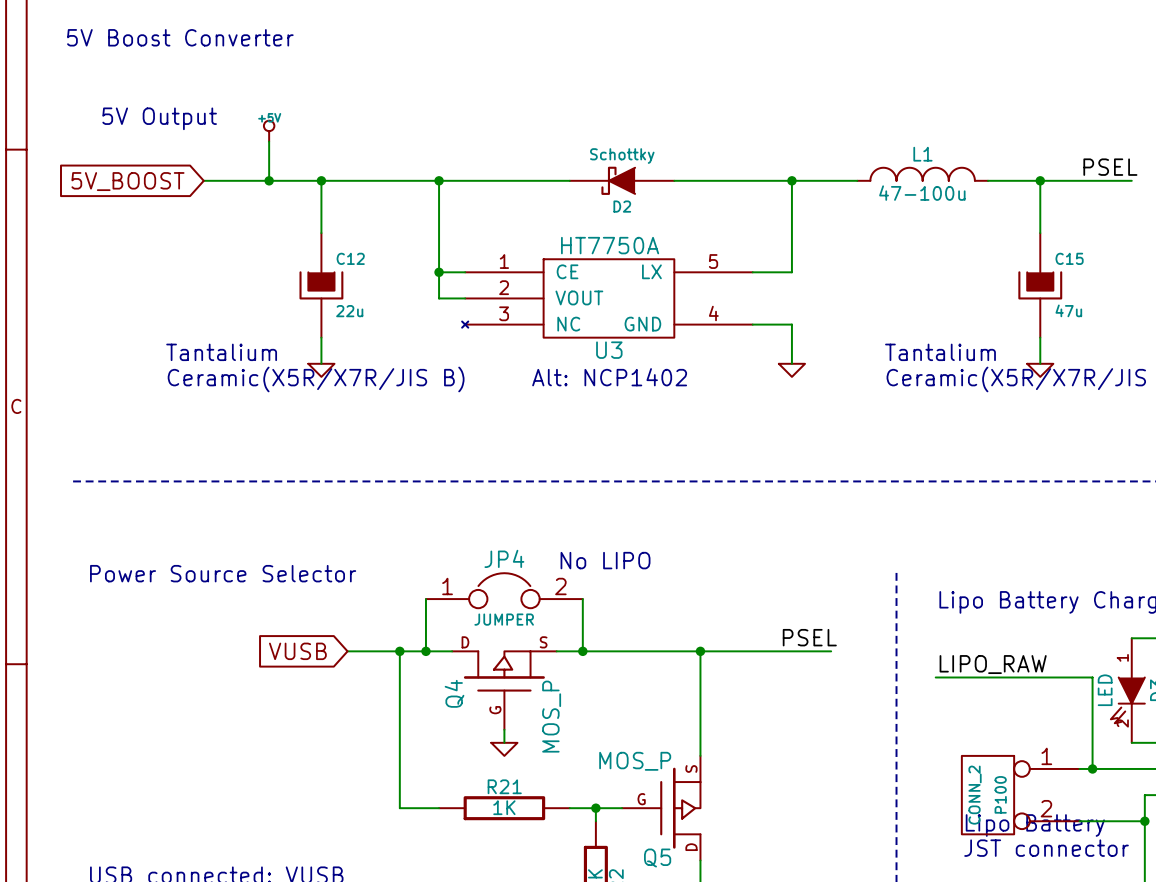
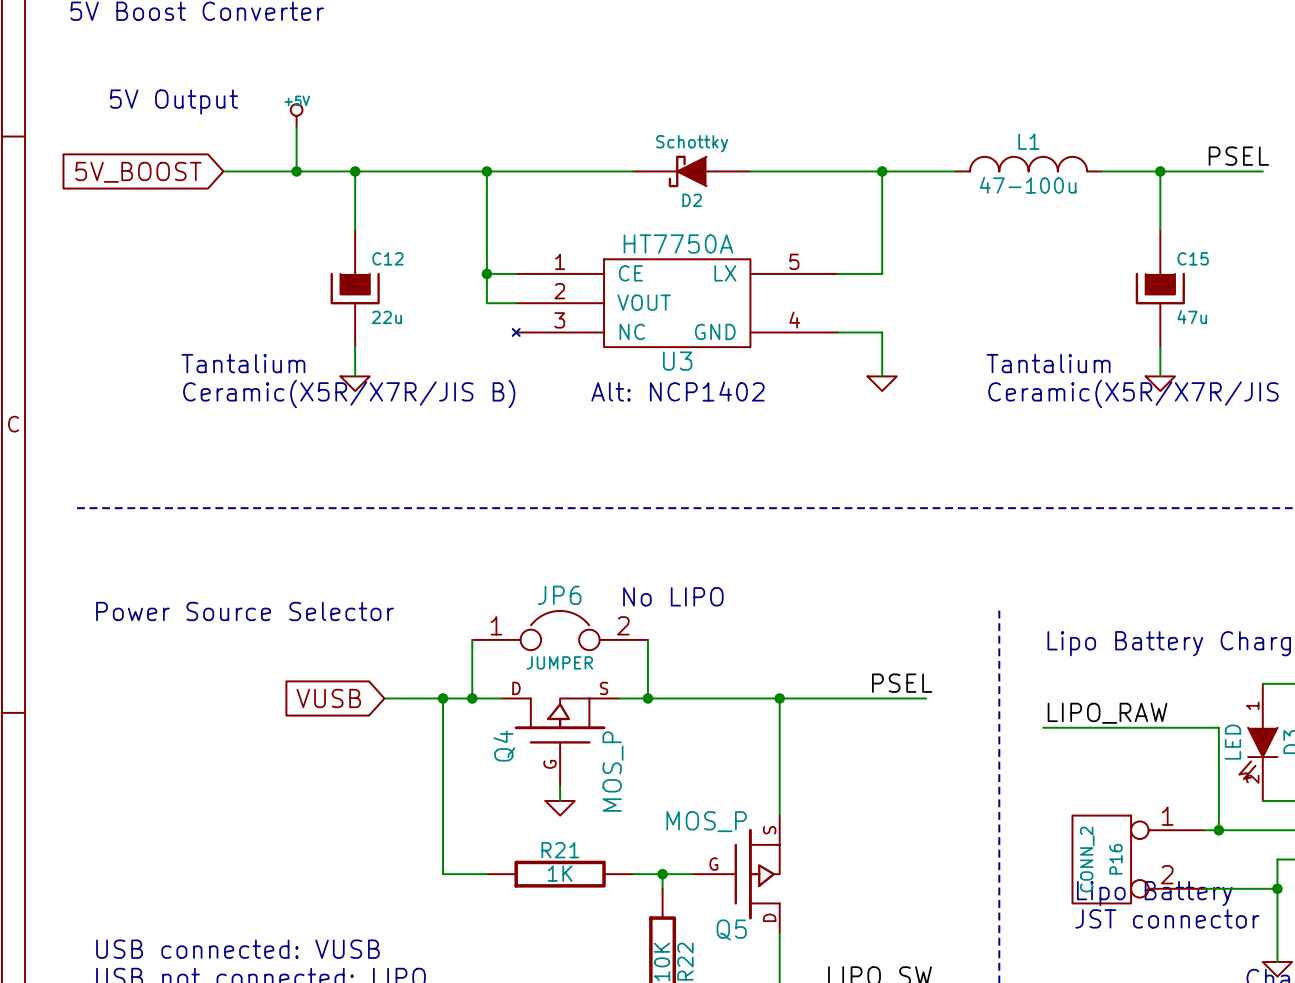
JP4 name: JP4 (504, 558) -> JP6 (559, 595)
P100 name: P100 (1000, 794) -> P16 (1115, 859)

